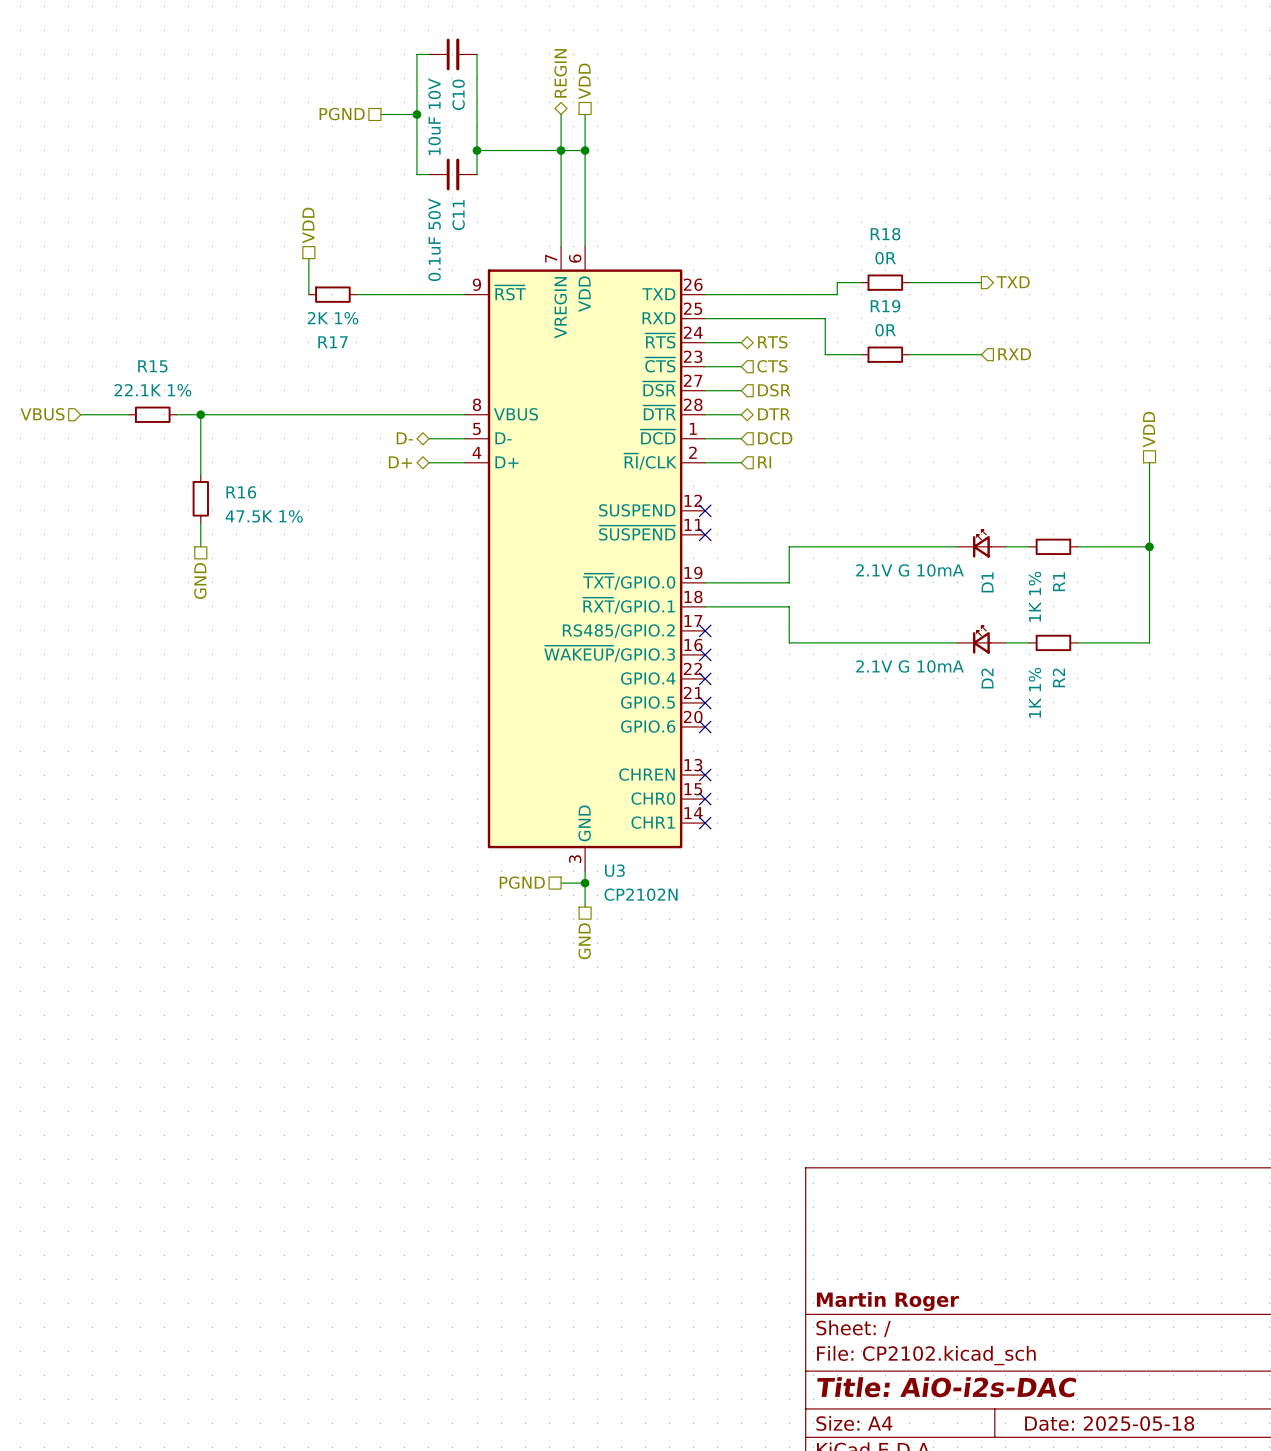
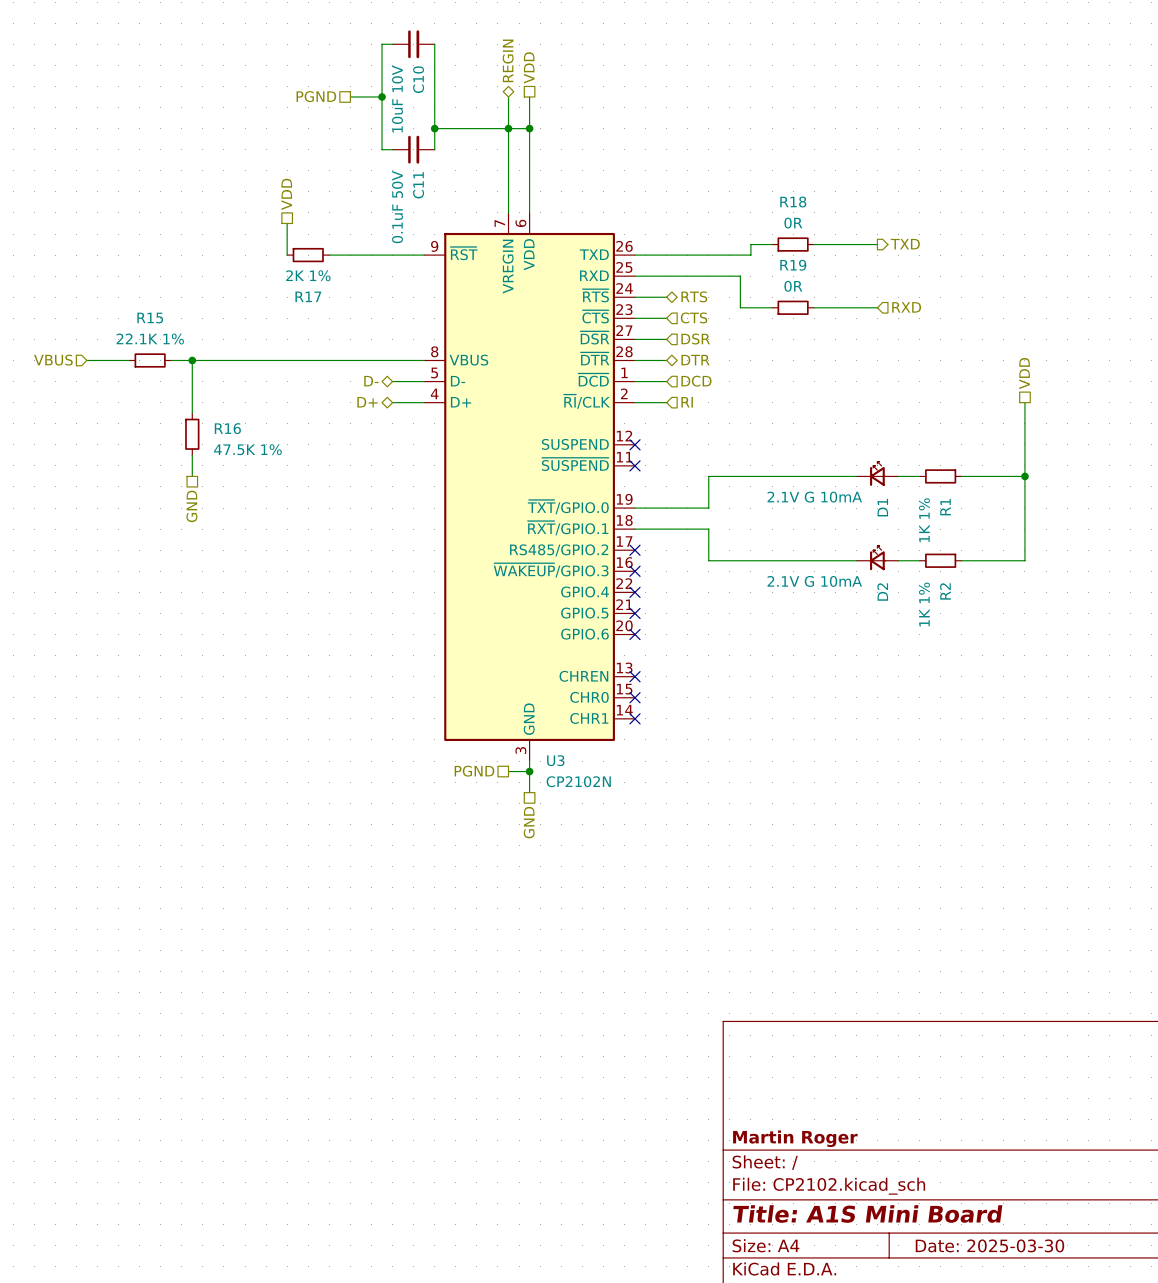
title block: Title: AiO-i2s-DAC (946, 1387) -> Title: A1S Mini Board (867, 1214)
title block: Date: 2025-05-18 (1109, 1423) -> Date: 2025-03-30 (989, 1245)

